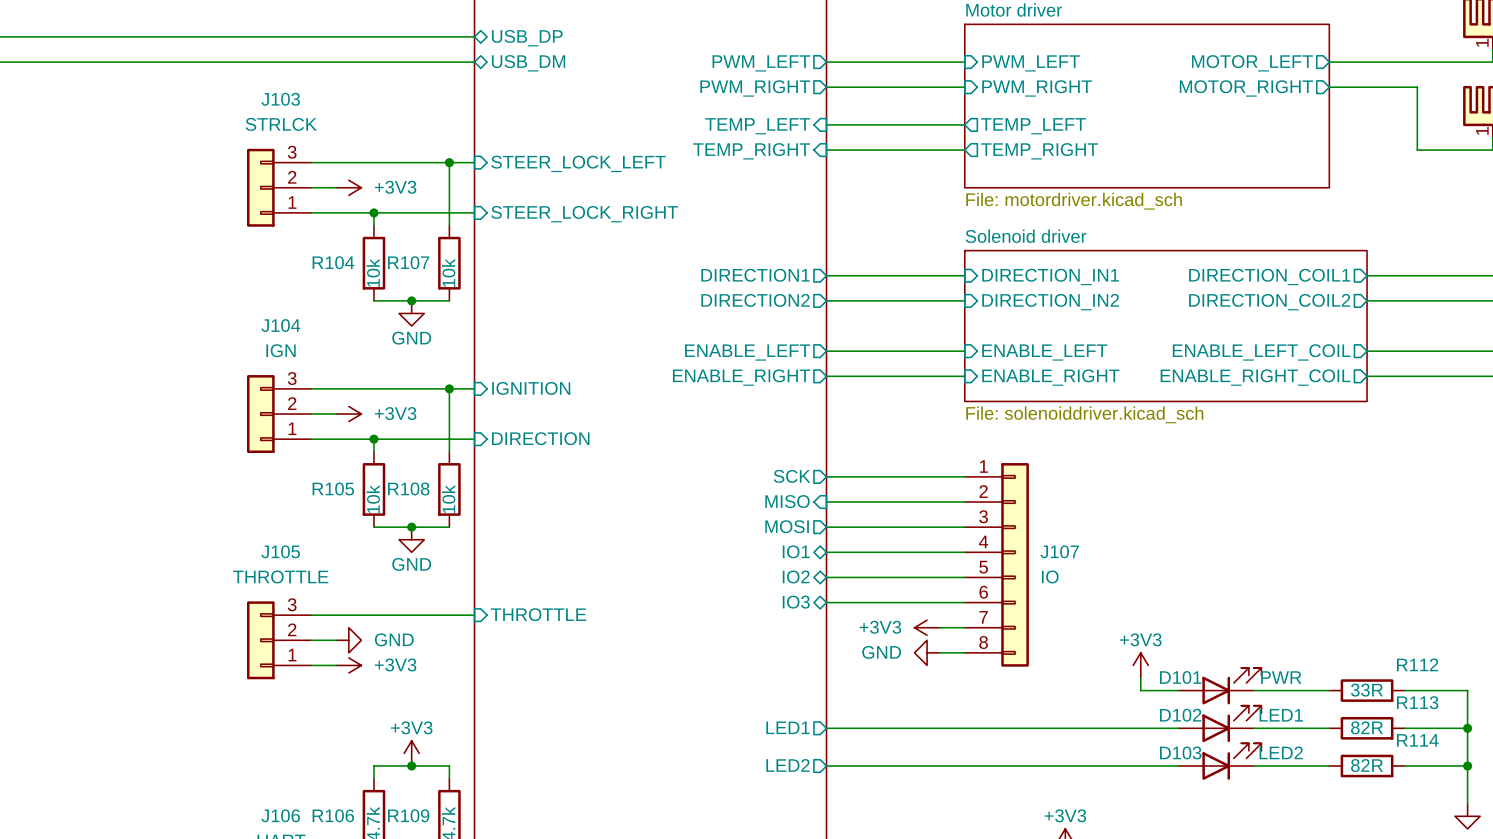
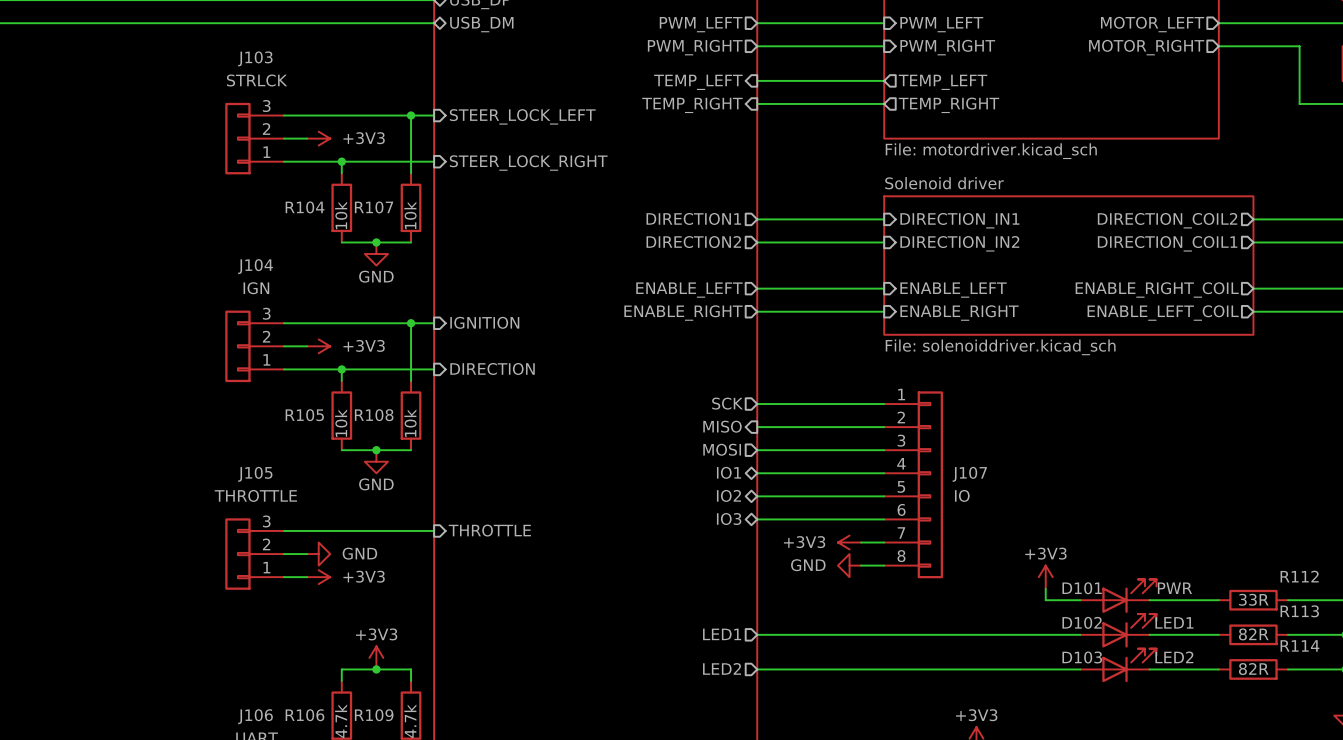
sheet pin: DIRECTION_COIL1 (1269, 277) -> DIRECTION_COIL2 (1167, 220)
sheet pin: DIRECTION_COIL2 (1269, 302) -> DIRECTION_COIL1 (1167, 243)
sheet pin: ENABLE_LEFT_COIL (1261, 352) -> ENABLE_RIGHT_COIL (1157, 289)
sheet pin: ENABLE_RIGHT_COIL (1255, 377) -> ENABLE_LEFT_COIL (1163, 313)

